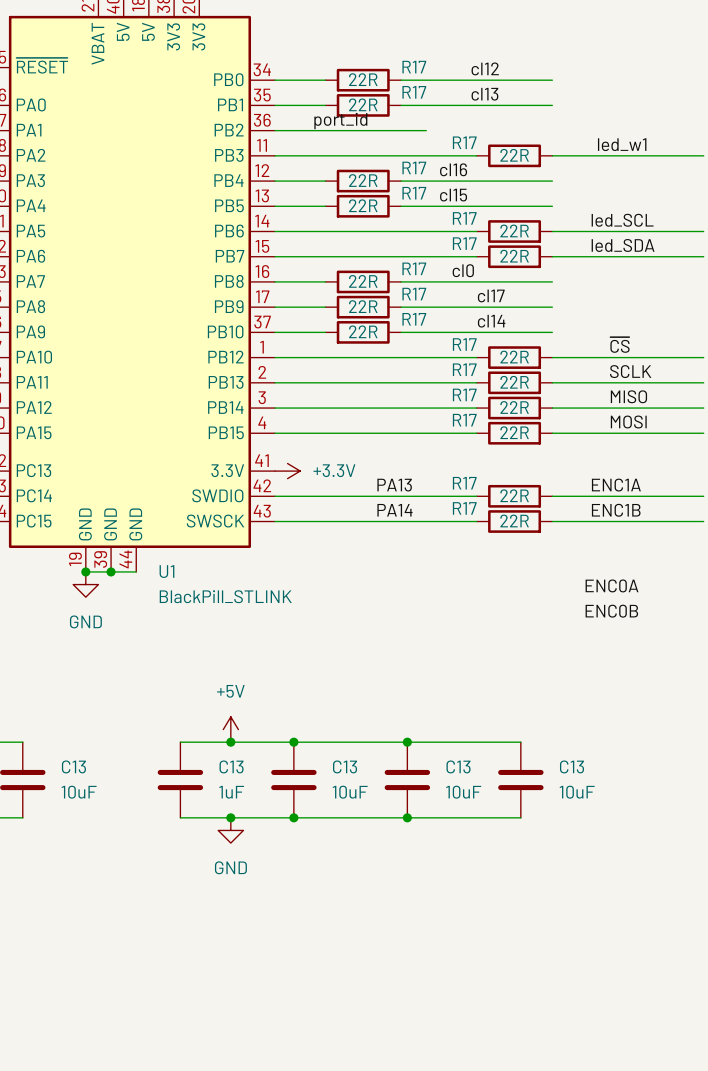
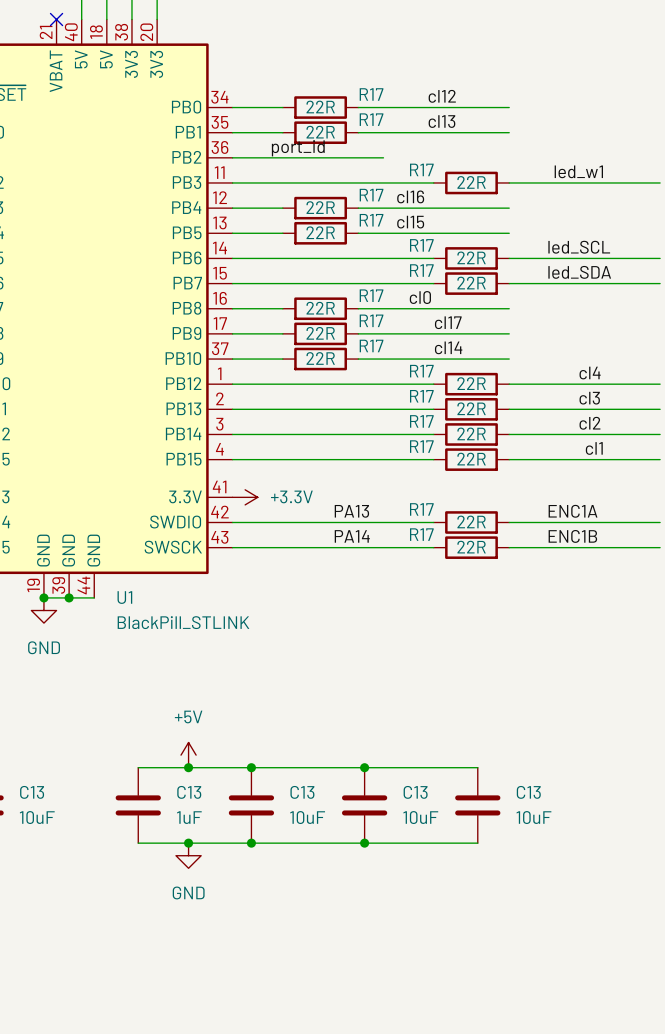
label: ~{CS} (619, 344) -> none
label: none -> cl4 (590, 373)
label: SCLK (630, 371) -> none
label: none -> cl3 (589, 398)
label: MISO (628, 396) -> none
label: none -> cl2 (589, 423)
label: MOSI (628, 422) -> none
label: none -> cl1 (594, 448)
label: ENC0A (611, 585) -> none
label: ENC0B (611, 611) -> none

